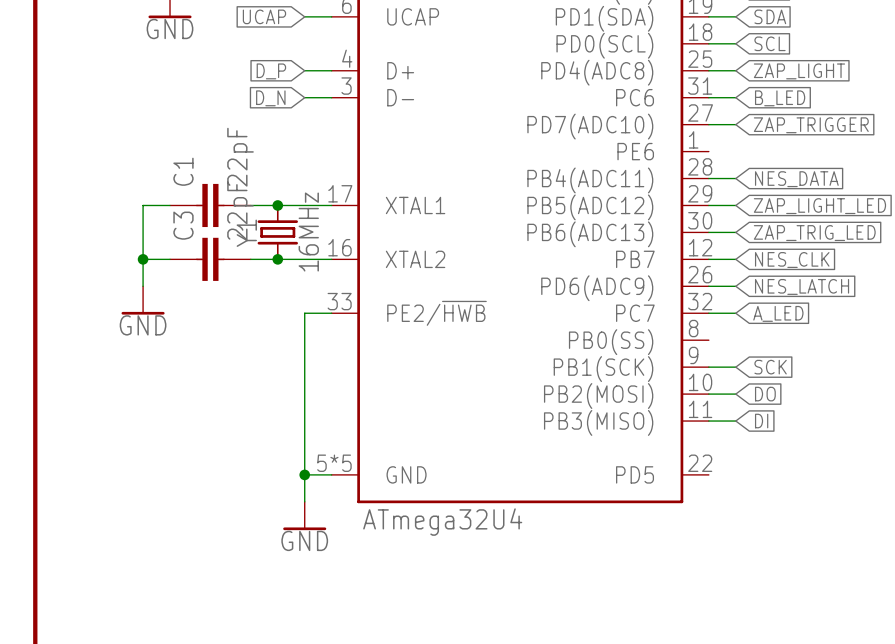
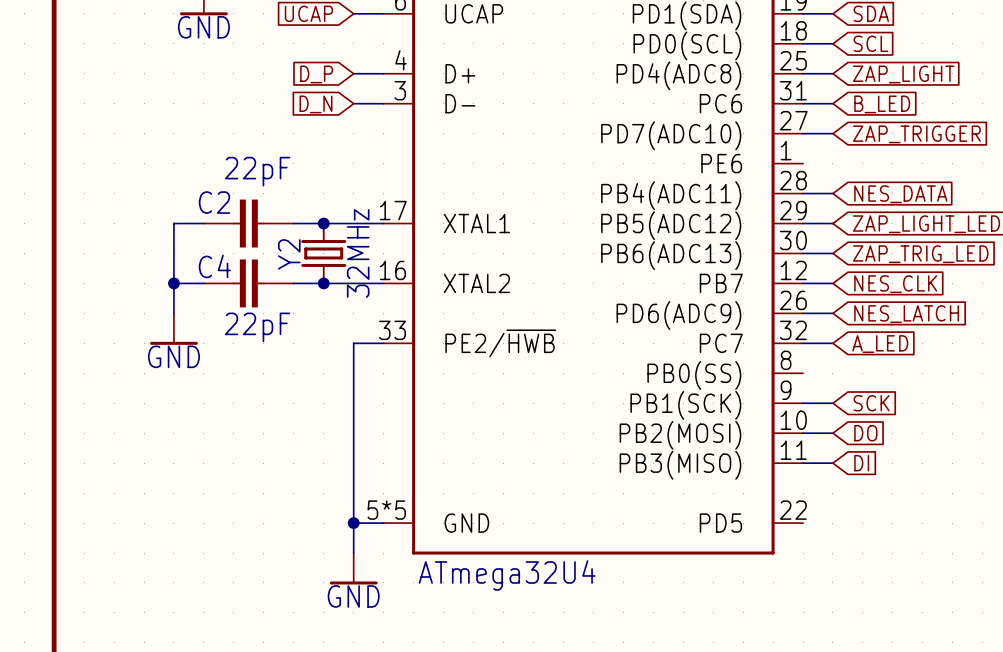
C1 value rotation: 0° (240, 157) -> 90° clockwise (257, 171)
C1 name: C1 (183, 171) -> C2 (214, 202)
C3 value rotation: 0° (240, 211) -> 90° clockwise (257, 327)
C3 value position: 22pF (240, 211) -> 22pF (257, 327)
C3 name: C3 (183, 225) -> C4 (214, 266)
Y1 value: 16MHz (308, 232) -> 32MHz (358, 253)
Y1 name: Y1 (246, 233) -> Y2 (289, 254)

